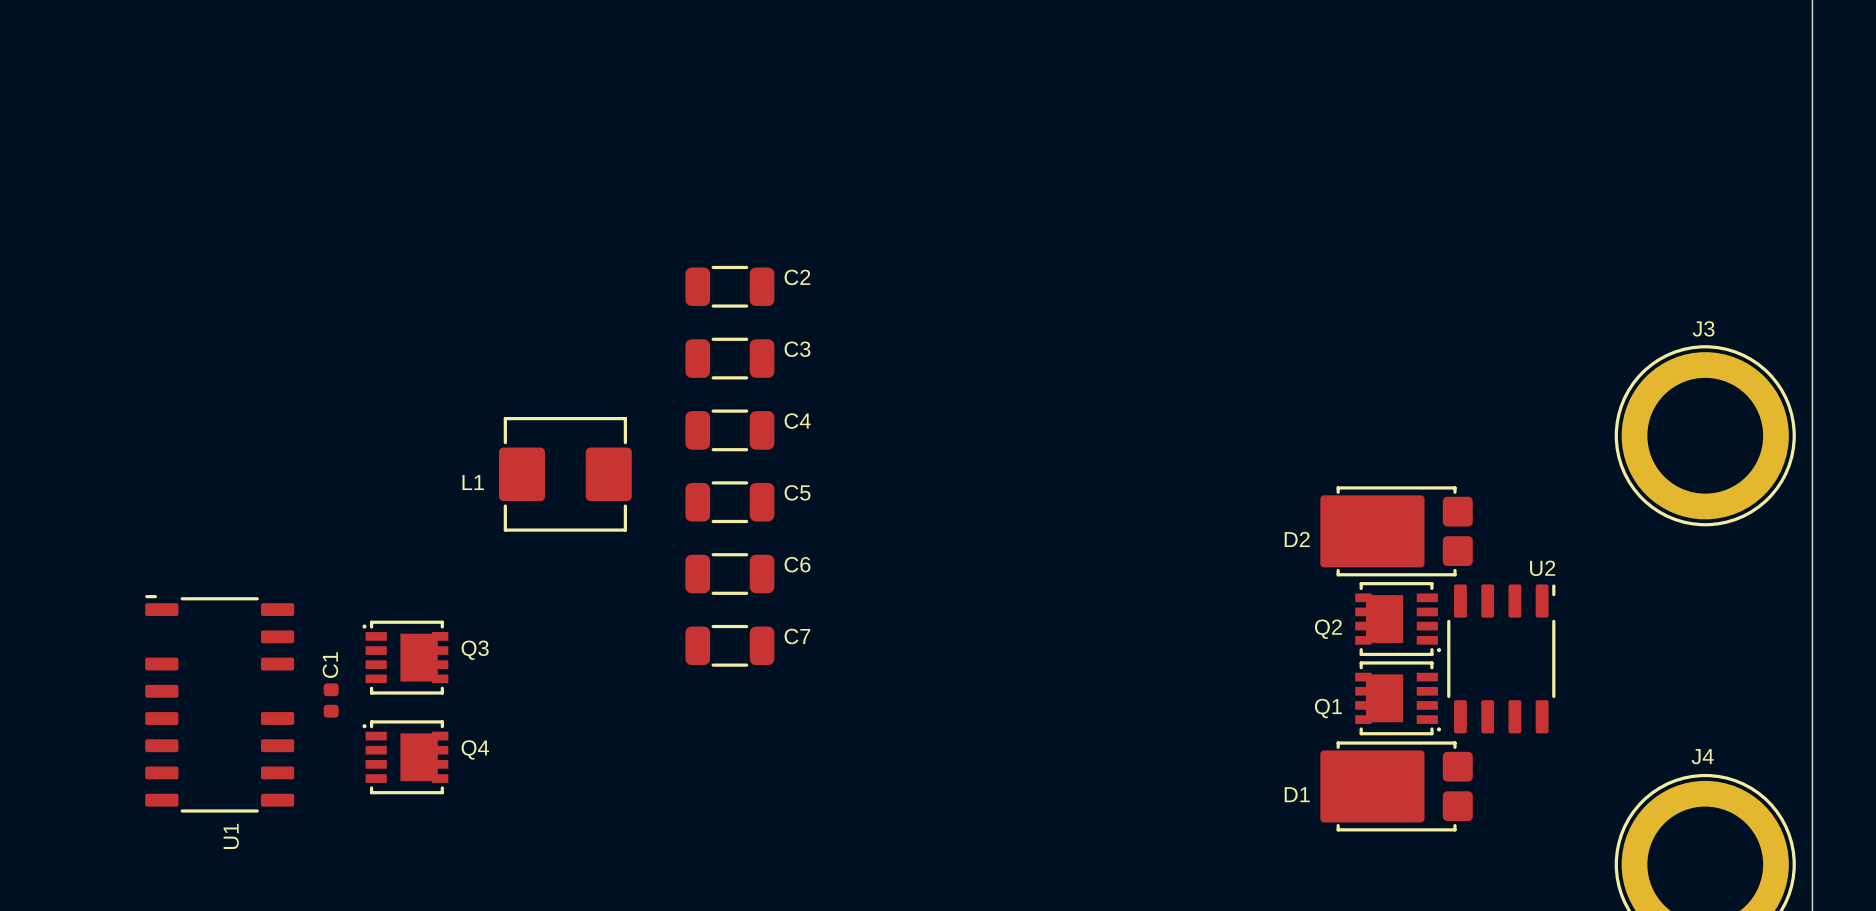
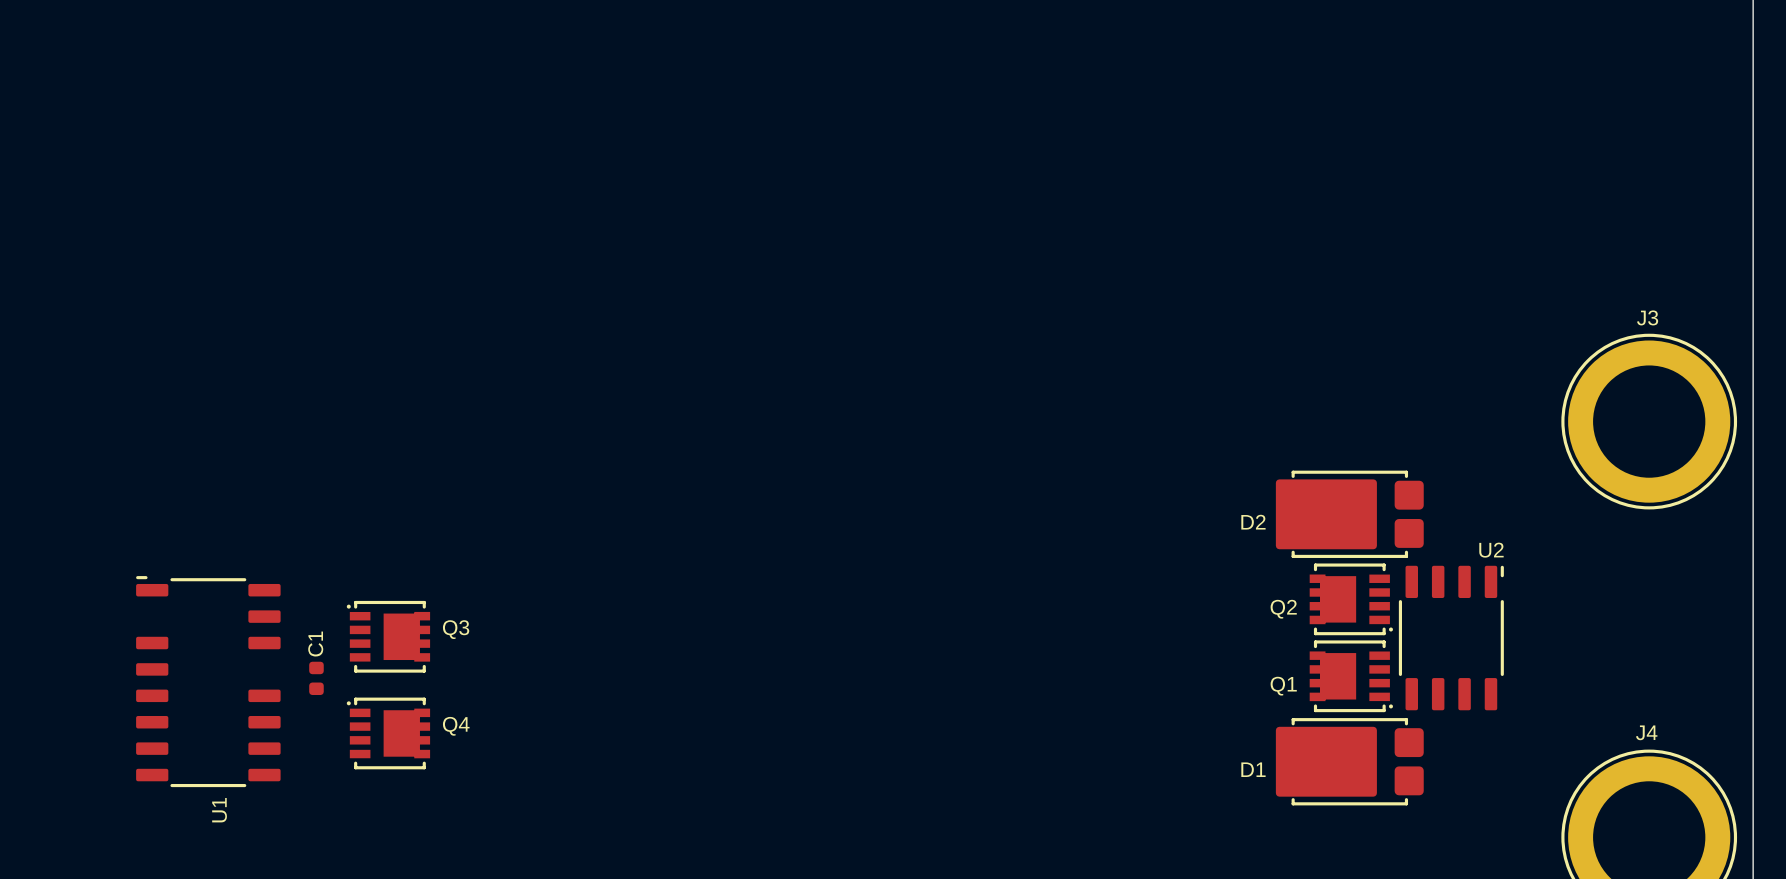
C2: (729, 286) -> none
C3: (729, 358) -> none
C4: (729, 430) -> none
L1: (565, 474) -> none
C5: (729, 502) -> none
C6: (729, 574) -> none
C7: (729, 645) -> none

